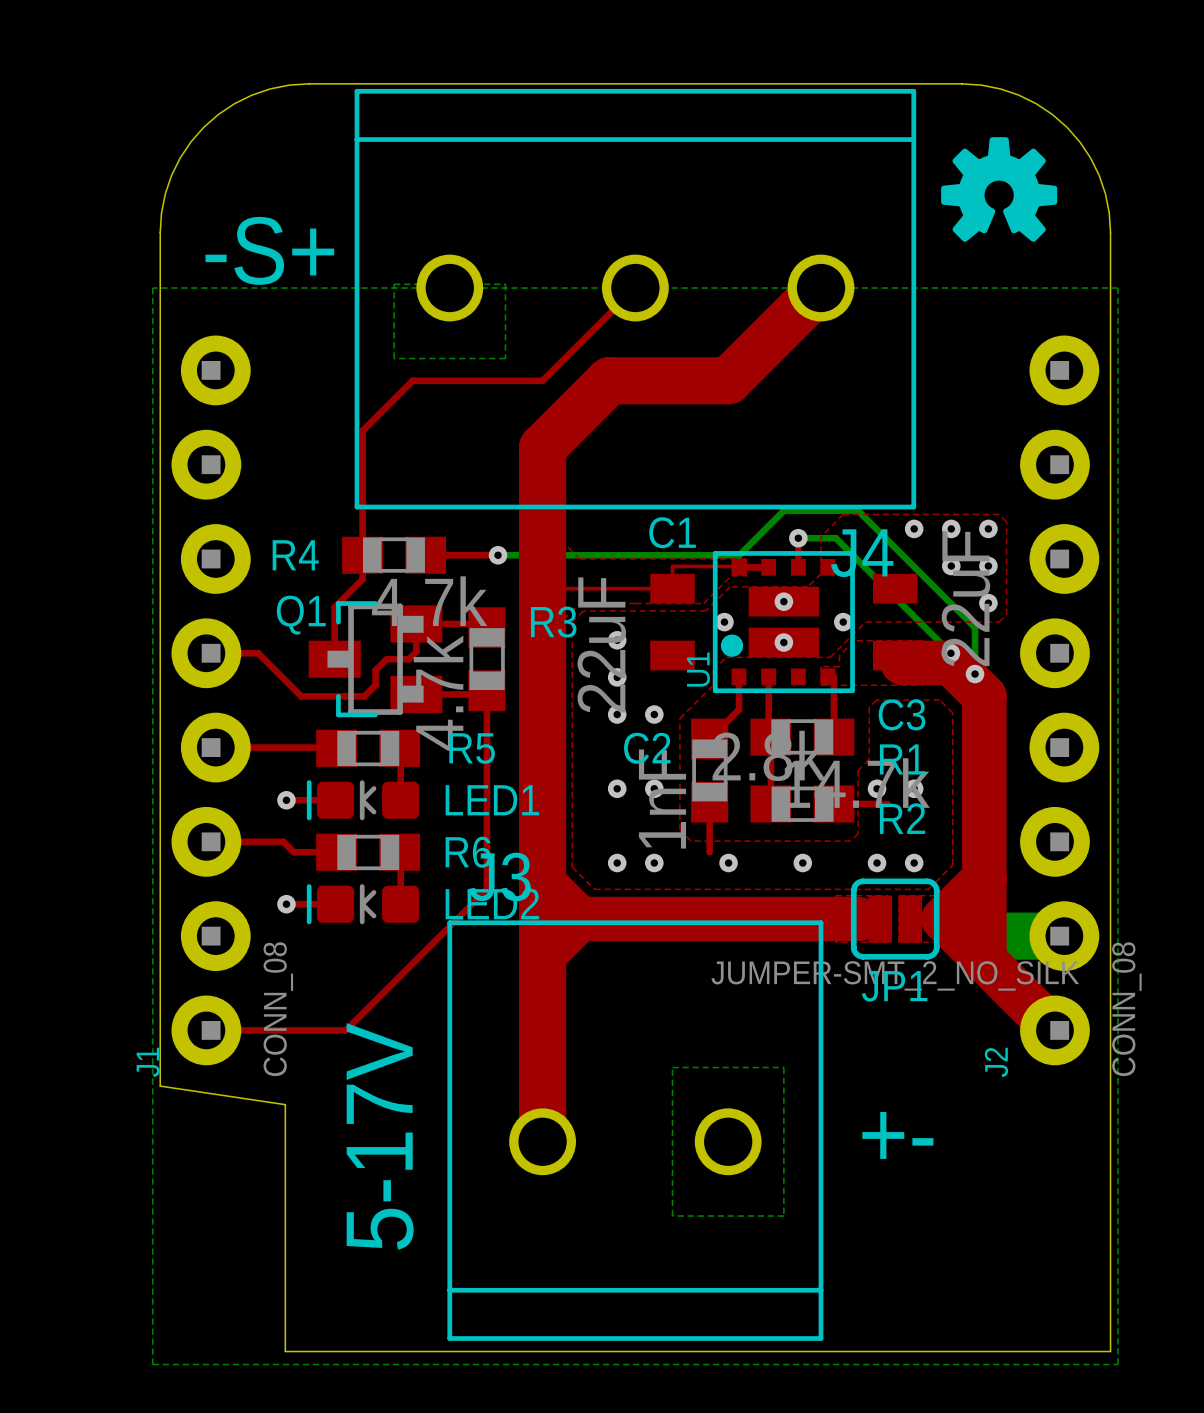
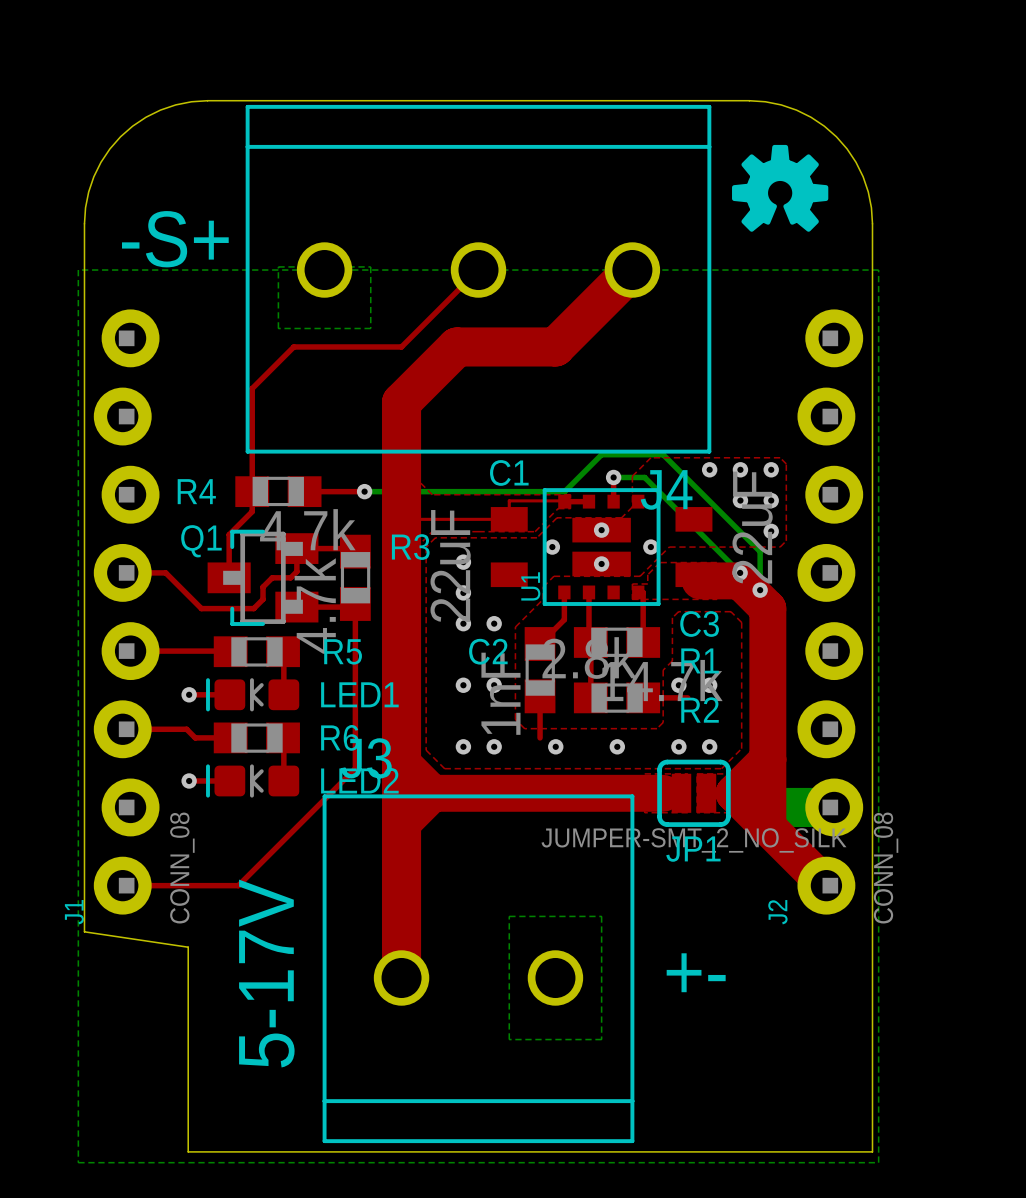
U1 footprint: [712, 551, 855, 694] -> [542, 488, 661, 606]

